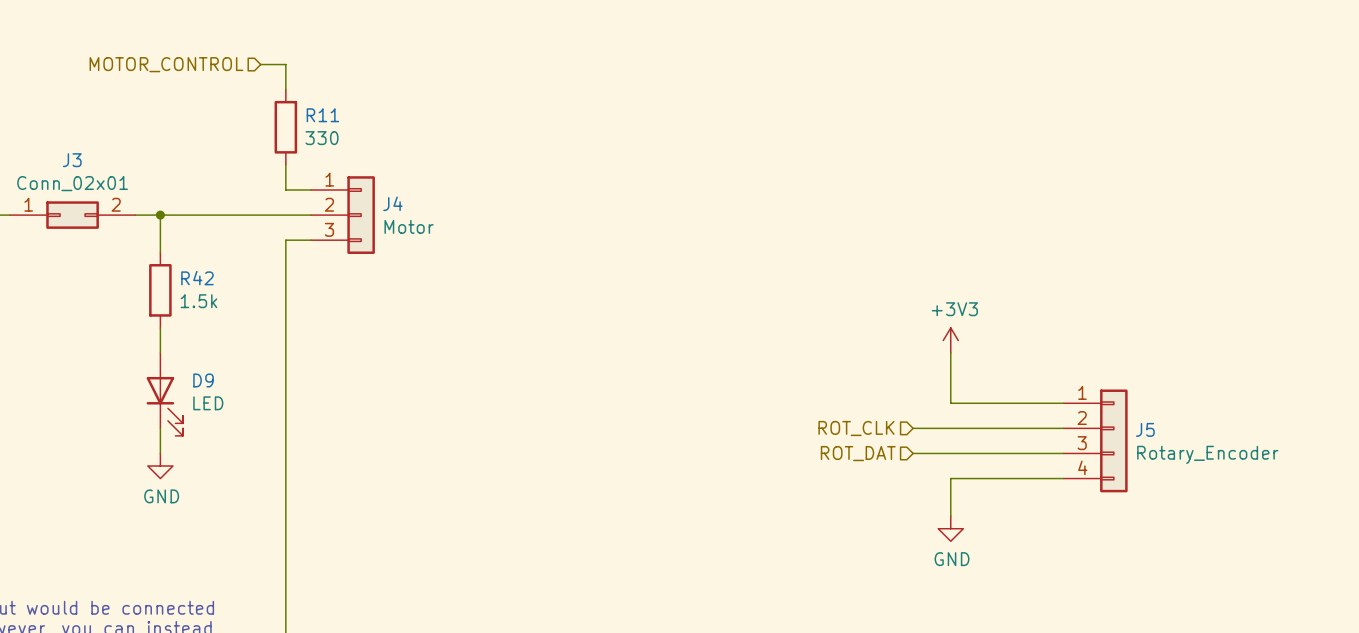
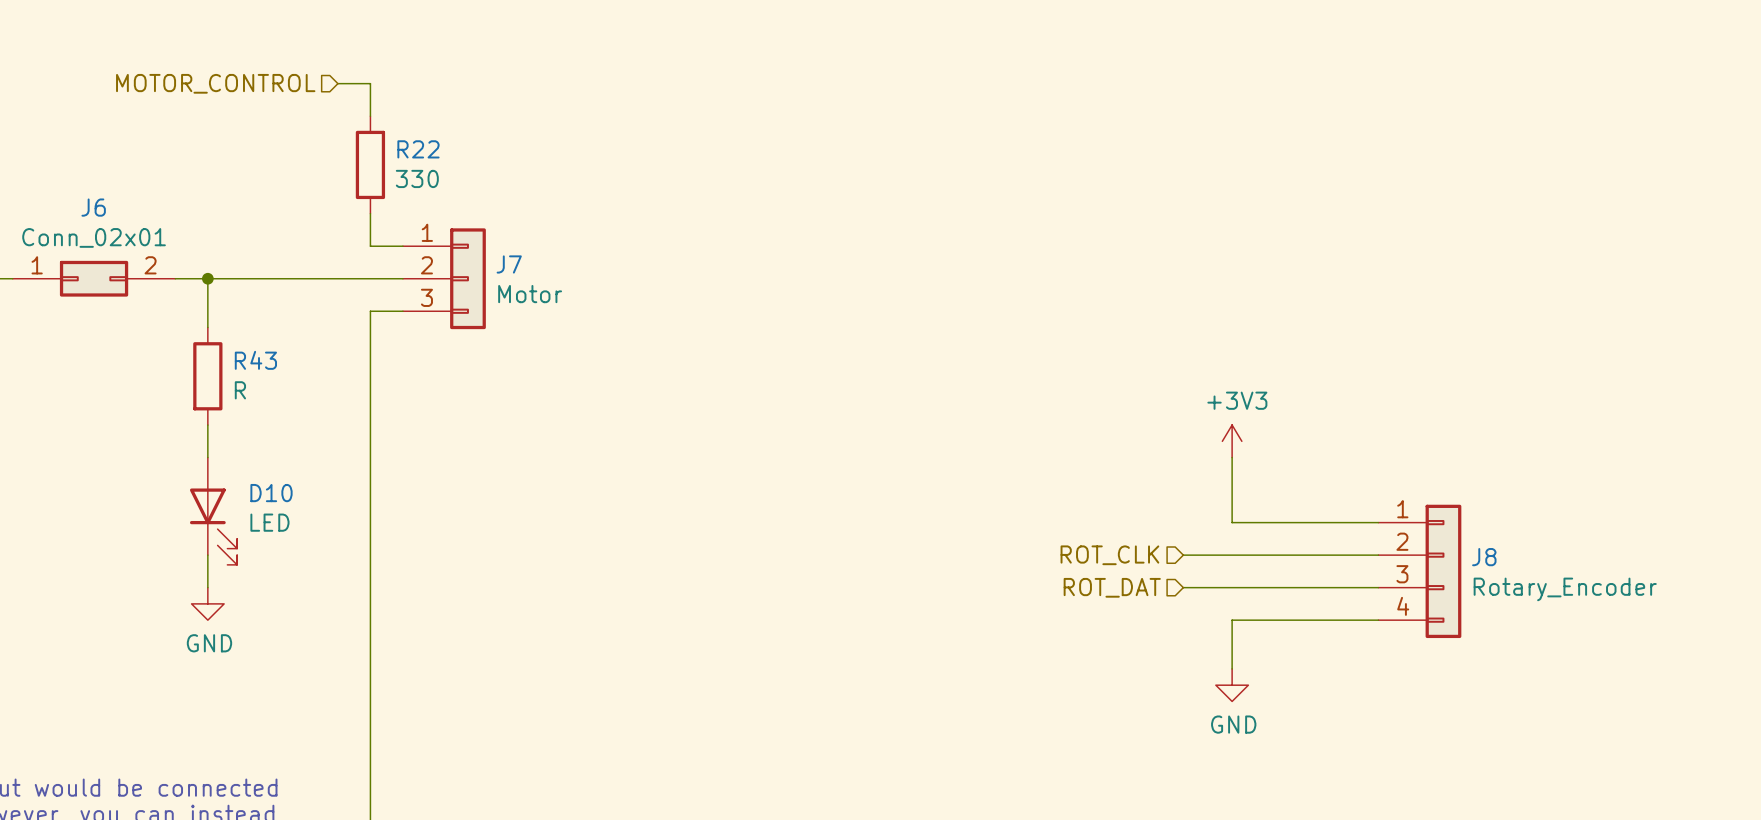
R11 name: R11 (322, 115) -> R22 (418, 149)
J3 name: J3 (72, 160) -> J6 (93, 207)
J4 name: J4 (392, 203) -> J7 (509, 264)
R42 name: R42 (197, 278) -> R43 (255, 360)
R42 value: 1.5k (198, 301) -> R (240, 390)
D9 name: D9 (203, 380) -> D10 (271, 493)
J5 name: J5 (1145, 429) -> J8 (1484, 557)

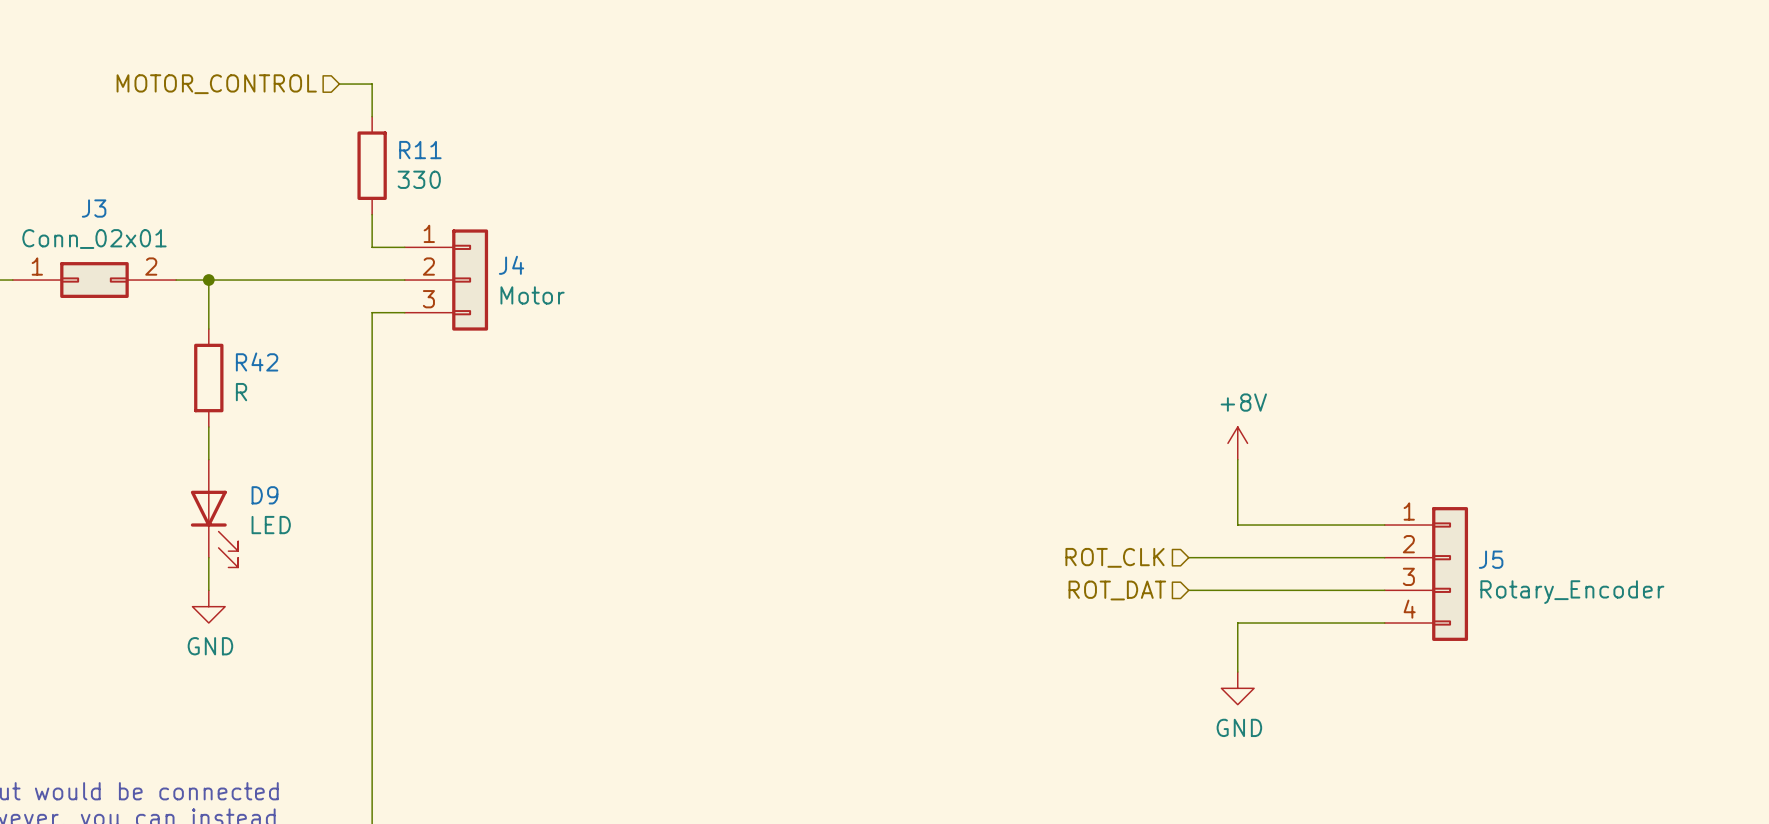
R22 name: R22 (418, 149) -> R11 (420, 150)
J6 name: J6 (93, 207) -> J3 (94, 208)
J7 name: J7 (509, 264) -> J4 (511, 265)
R43 name: R43 (255, 360) -> R42 (257, 361)
power symbol: +3V3 (1232, 441) -> +8V (1237, 443)
D10 name: D10 (271, 493) -> D9 (264, 495)
J8 name: J8 (1484, 557) -> J5 (1491, 559)

